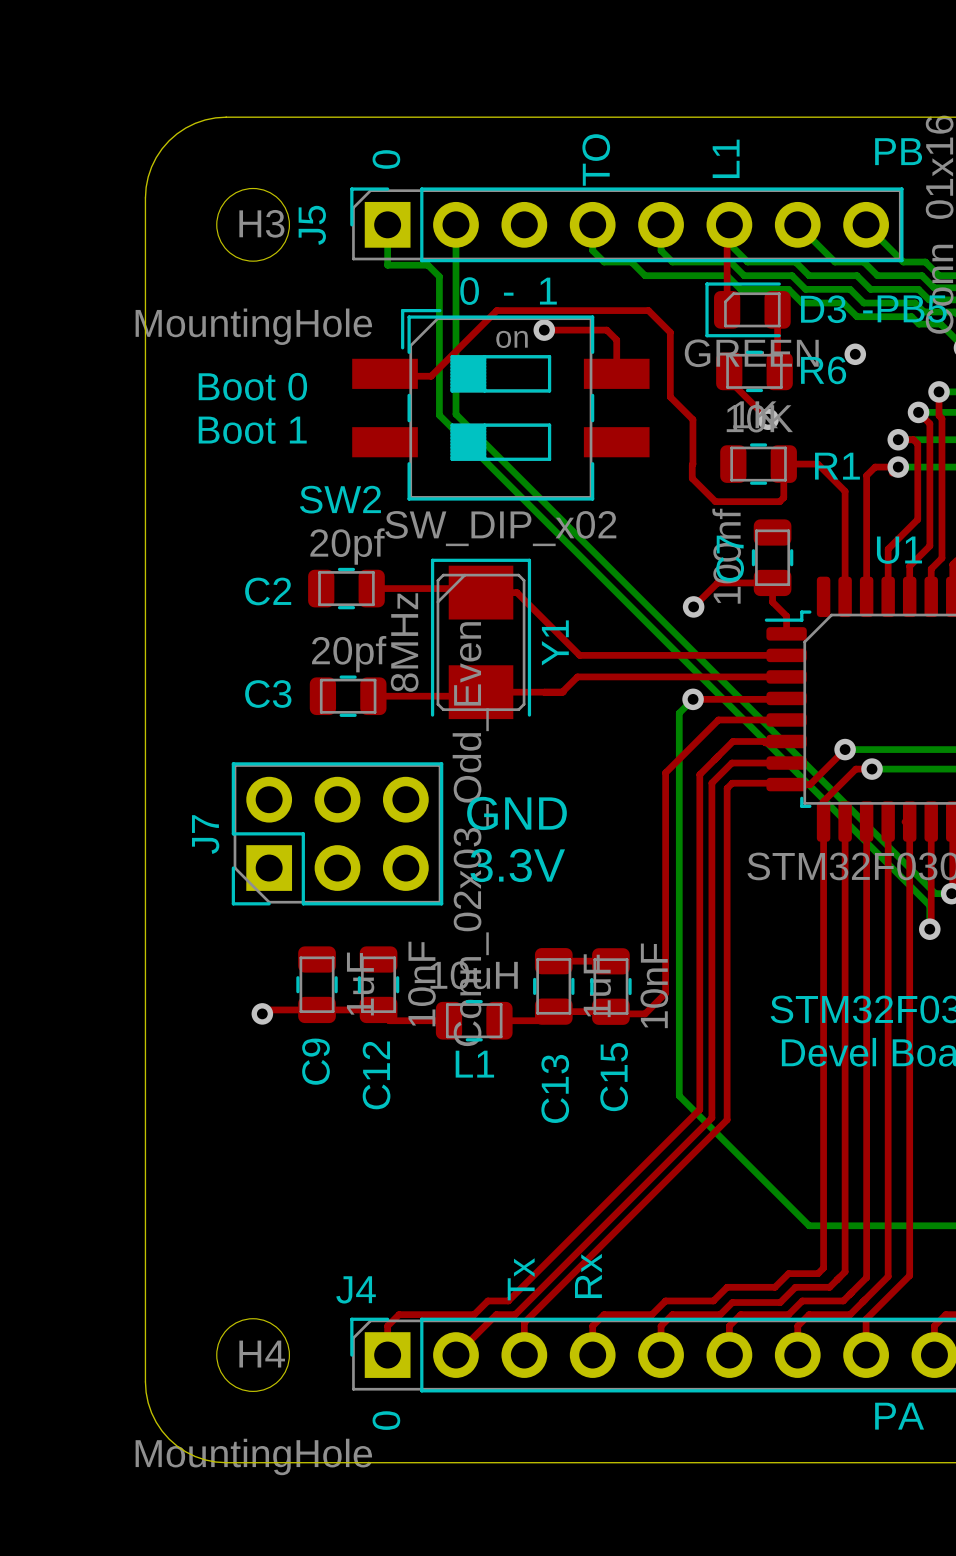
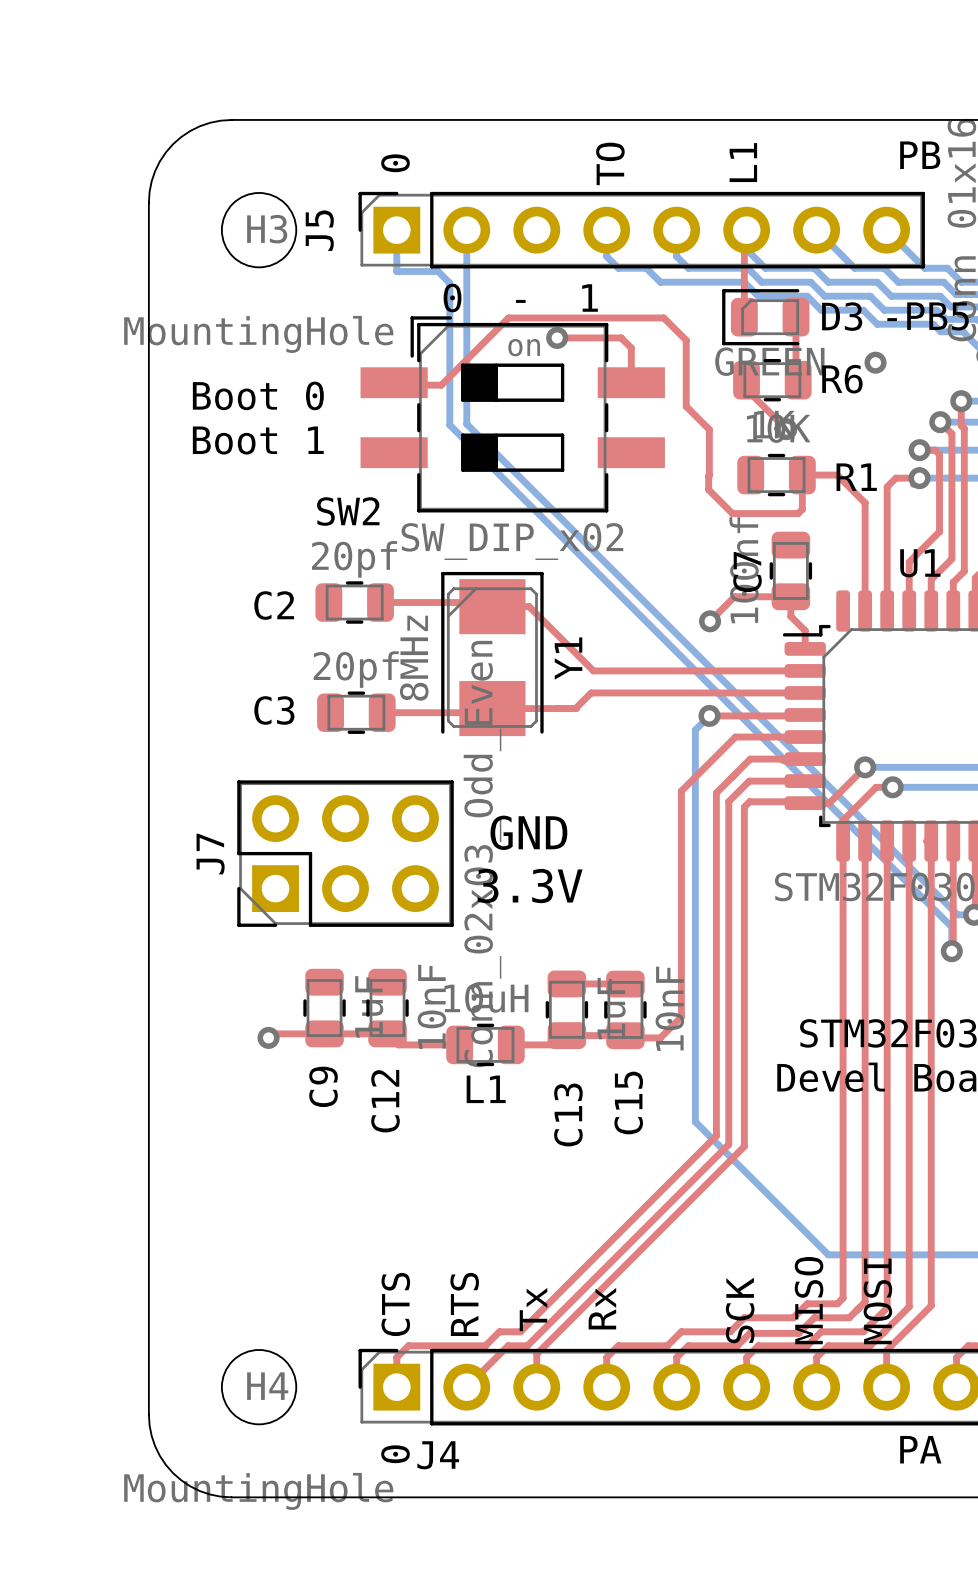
text: none -> MISO (809, 1300)
text: none -> MOSI (877, 1301)
text: none -> RTS (464, 1304)
text: none -> SCK (740, 1310)
text: none -> CTS (395, 1304)
J4 name position: J4 (356, 1289) -> J4 (438, 1455)

